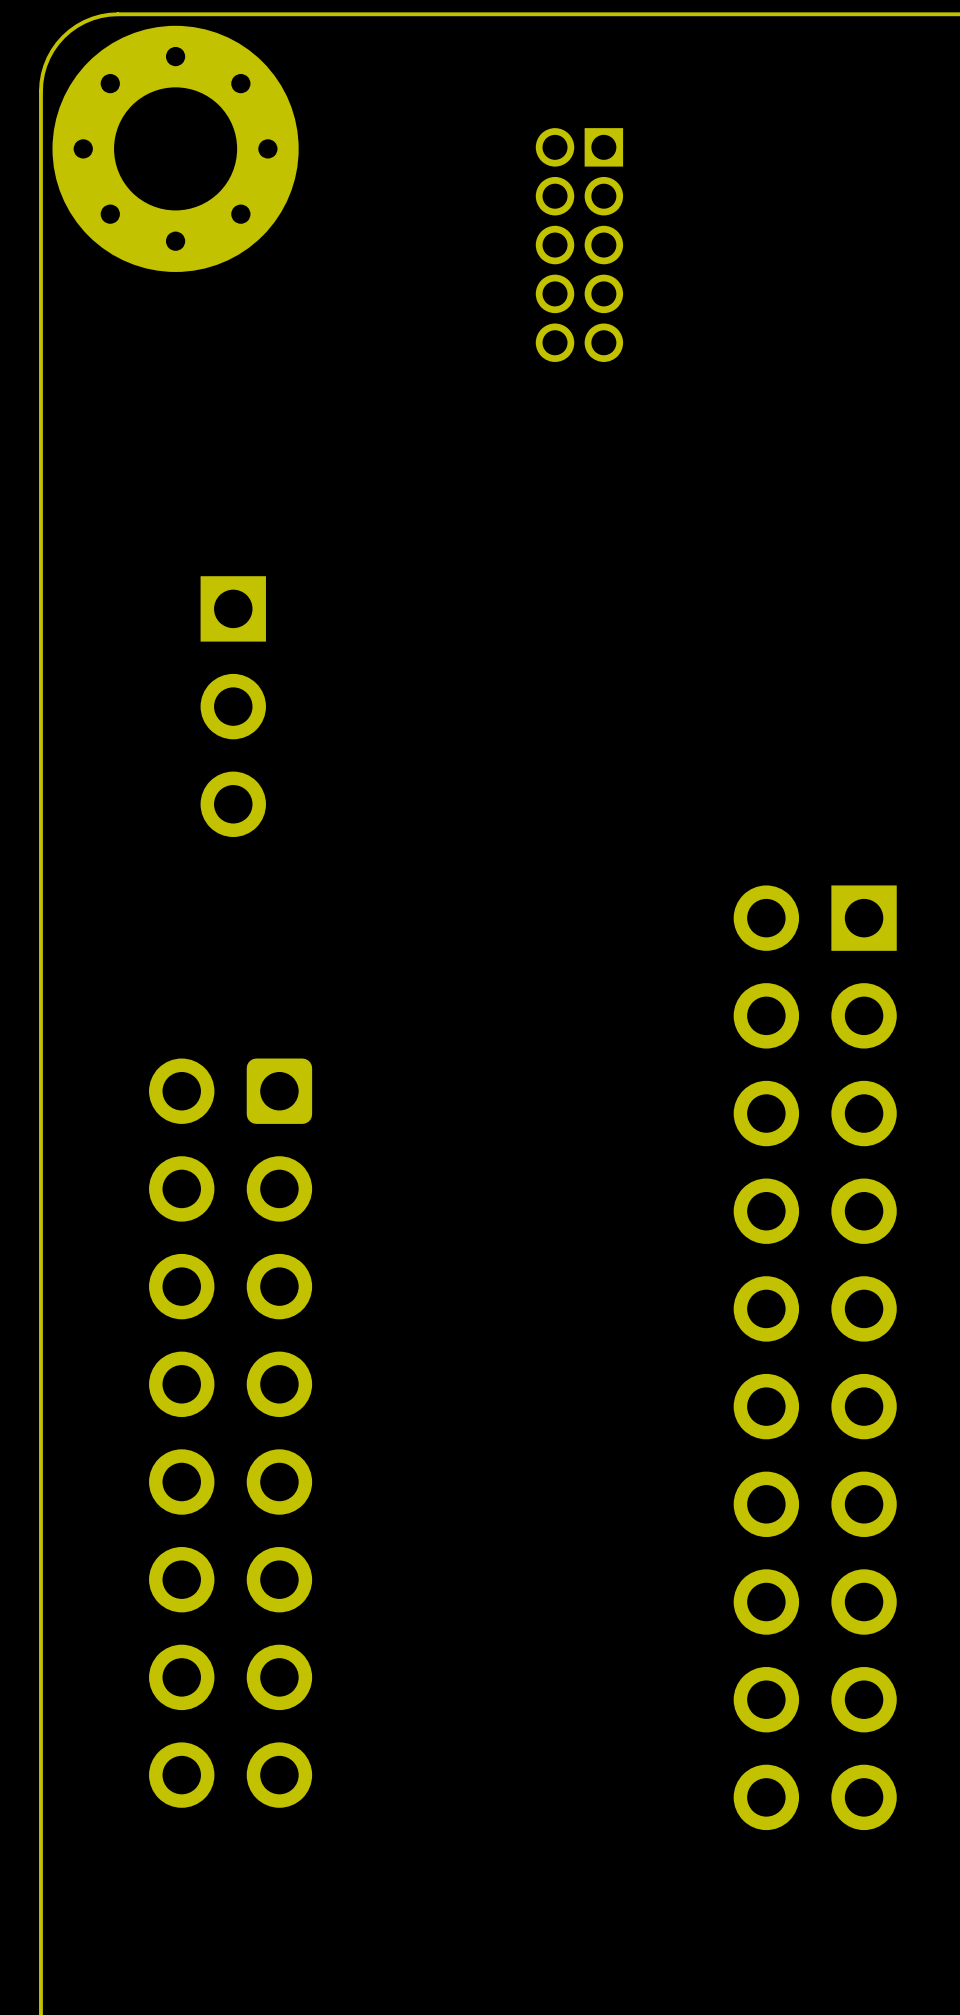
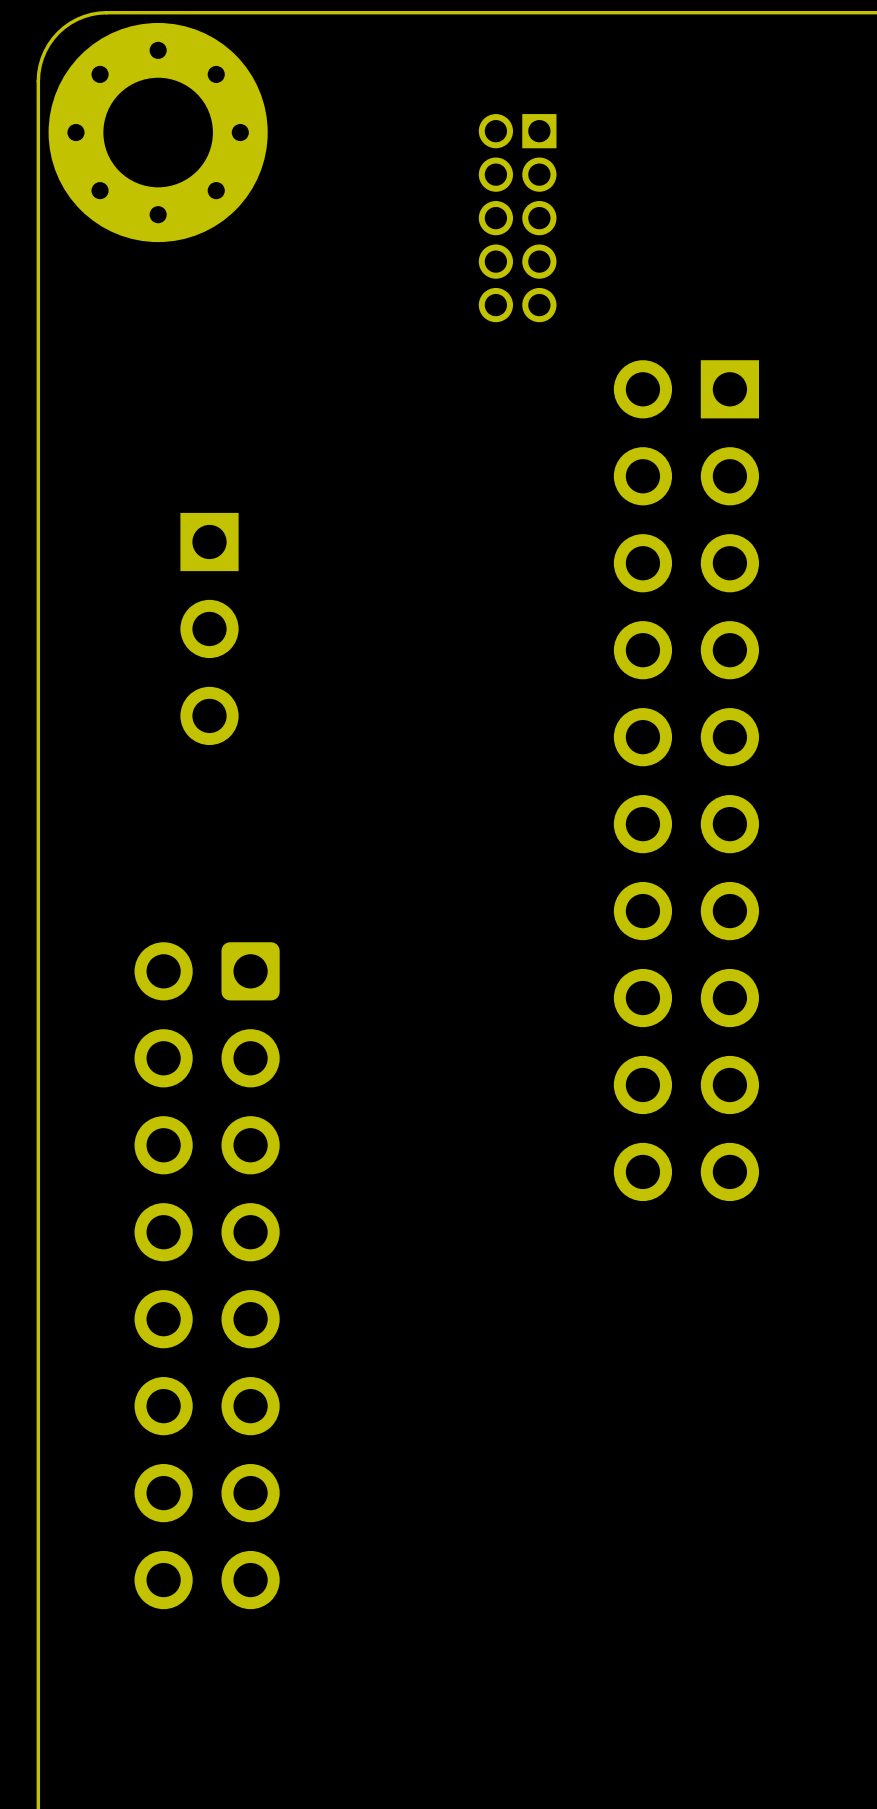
part position: (815, 1357) -> (686, 780)

